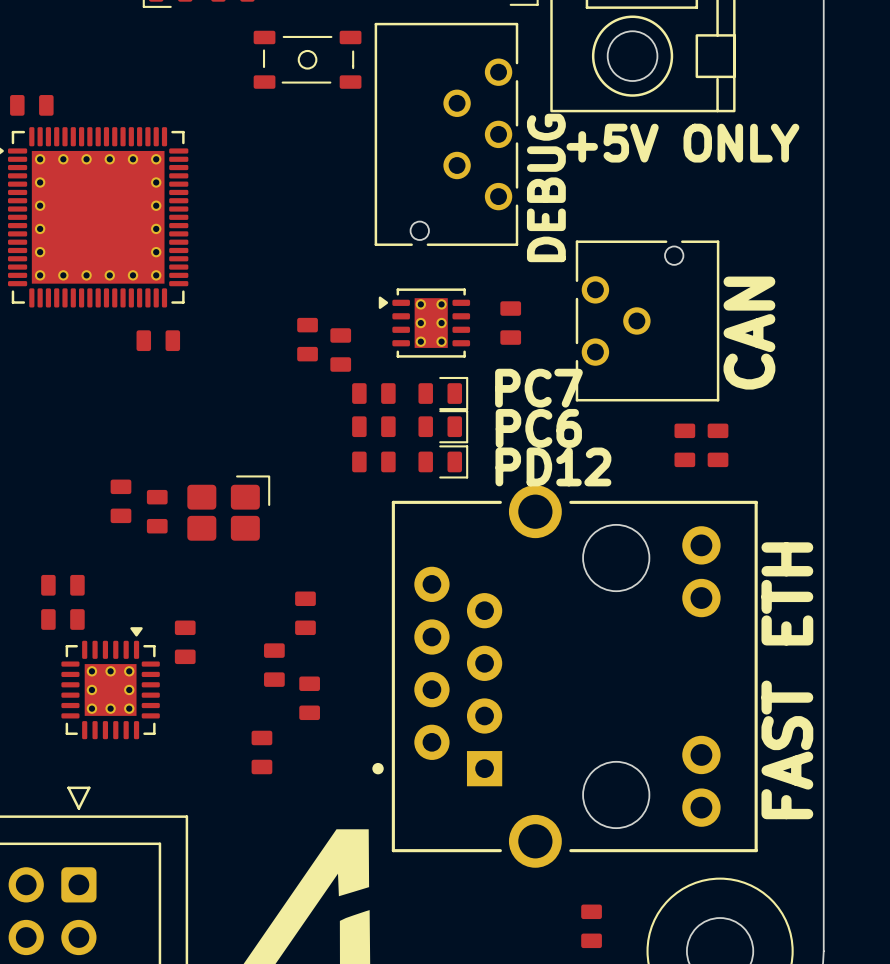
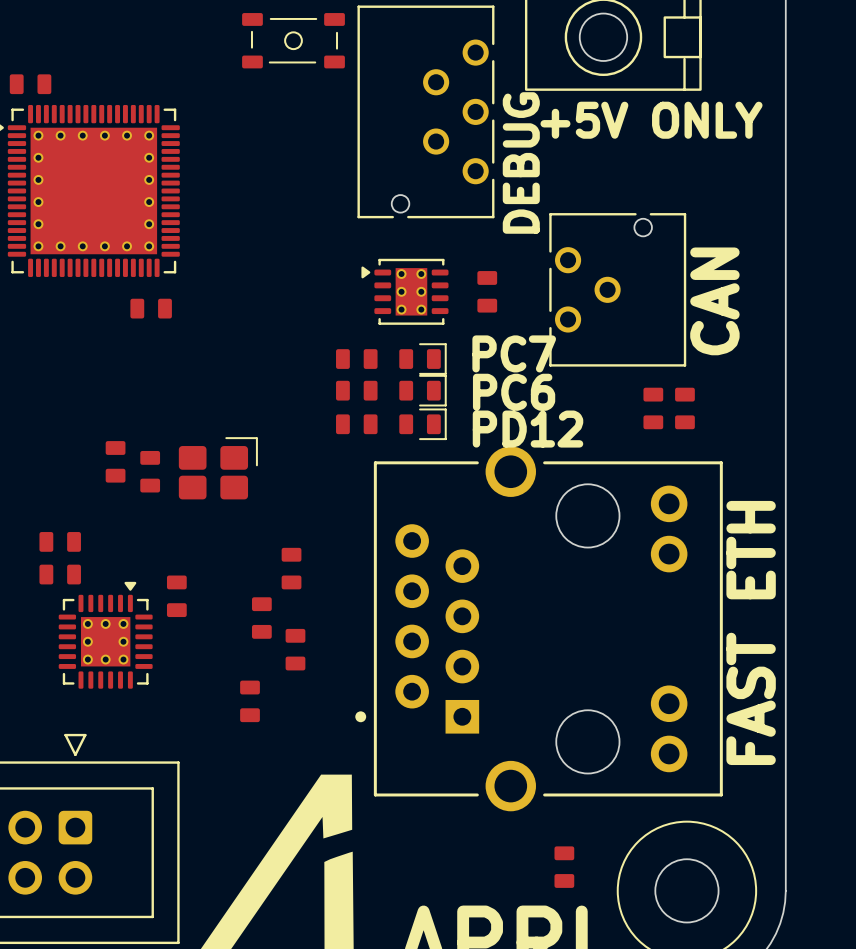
part: (307, 339) -> none
part: (340, 349) -> none

